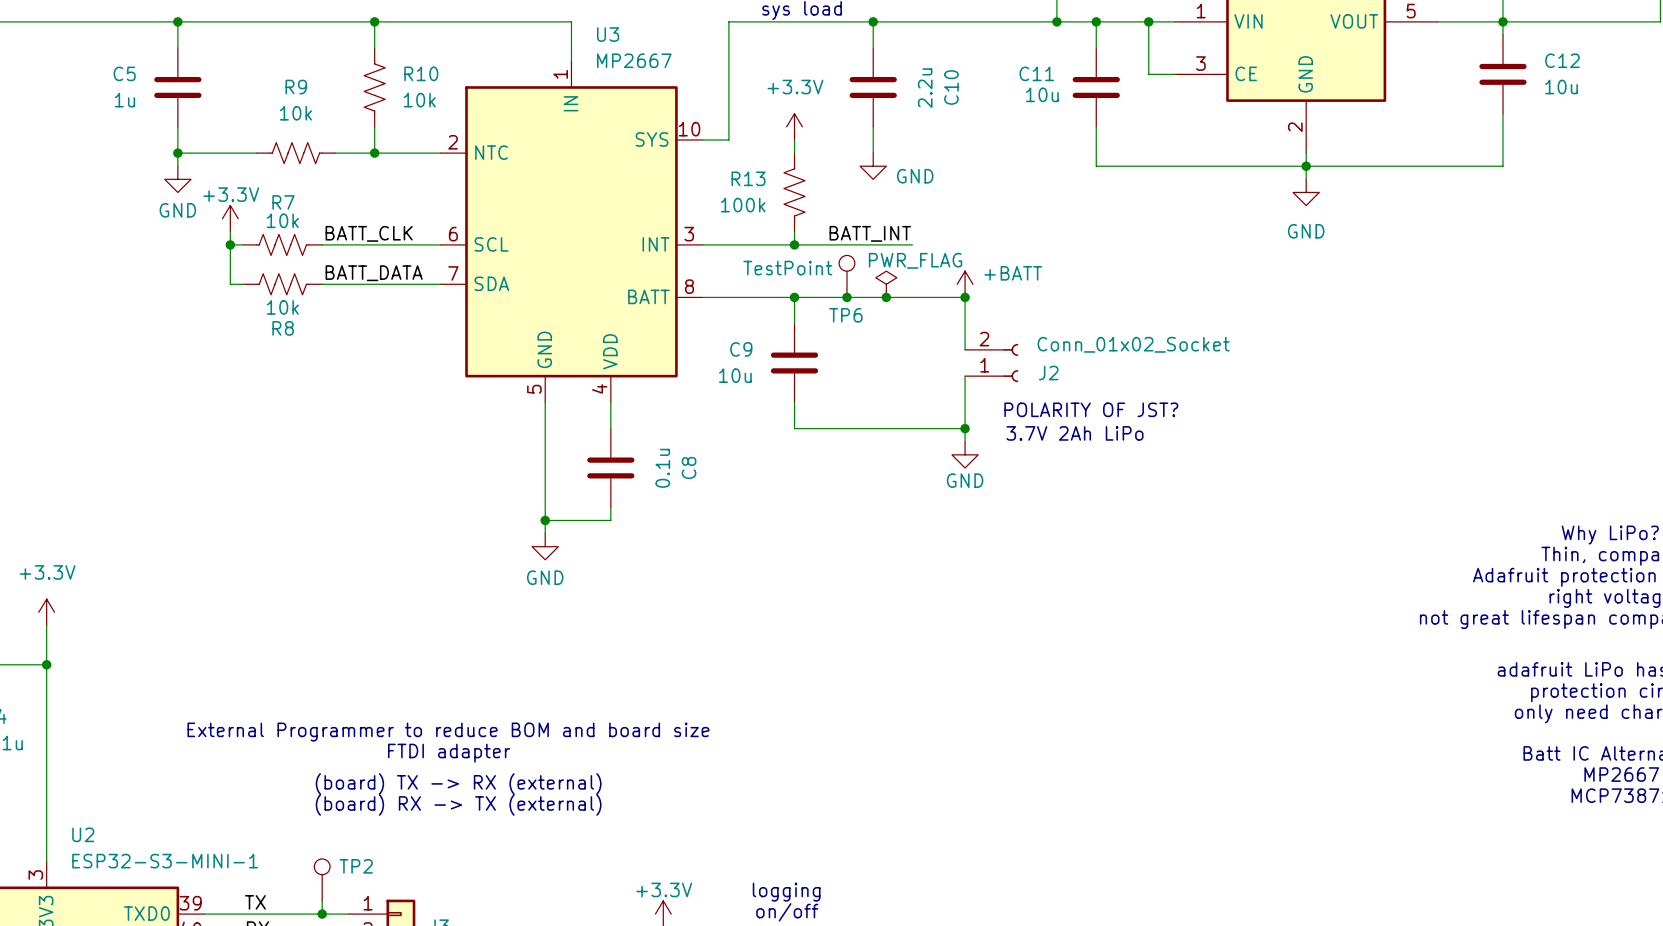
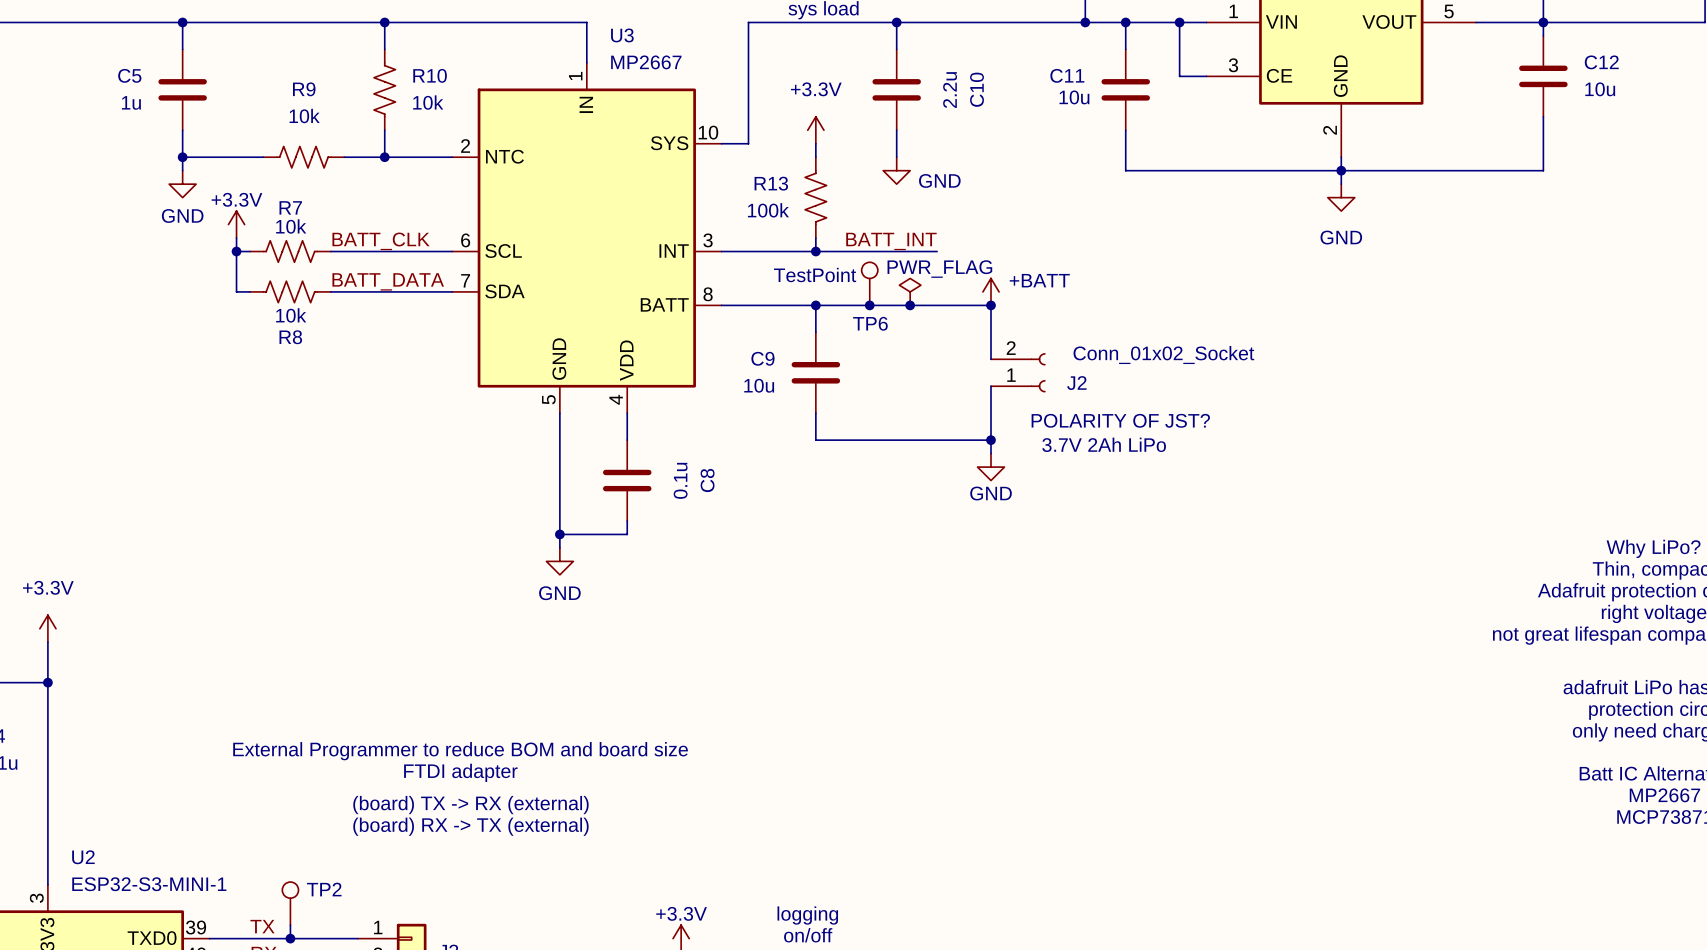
TP2 position: (322, 879) -> (290, 903)
wire: (322, 900) (322, 914) -> (290, 925) (290, 938)
junction: none -> (290, 938)
junction: (322, 914) -> none

